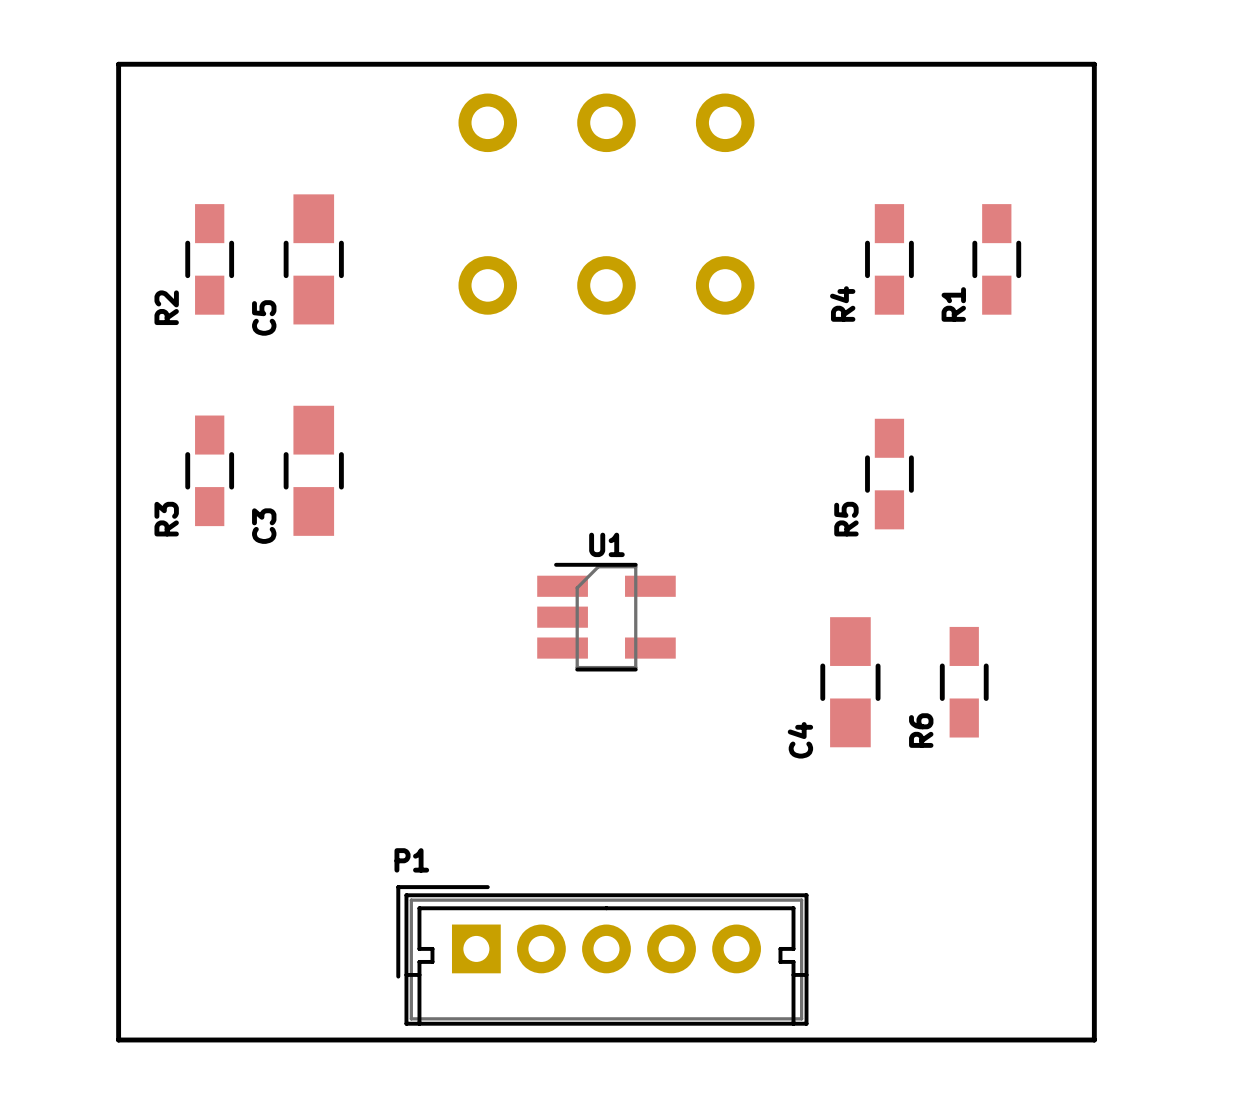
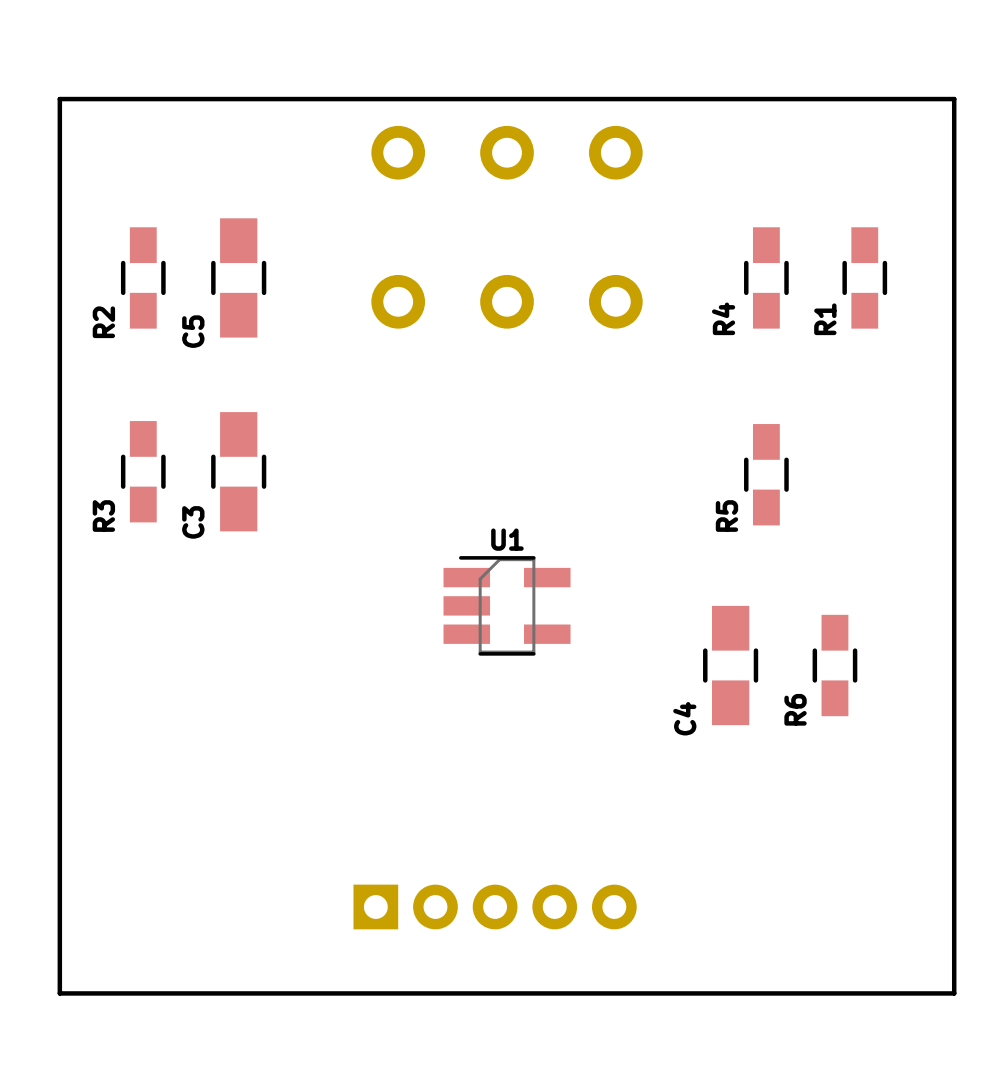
part: none -> (495, 906)
P1: (602, 955) -> none

